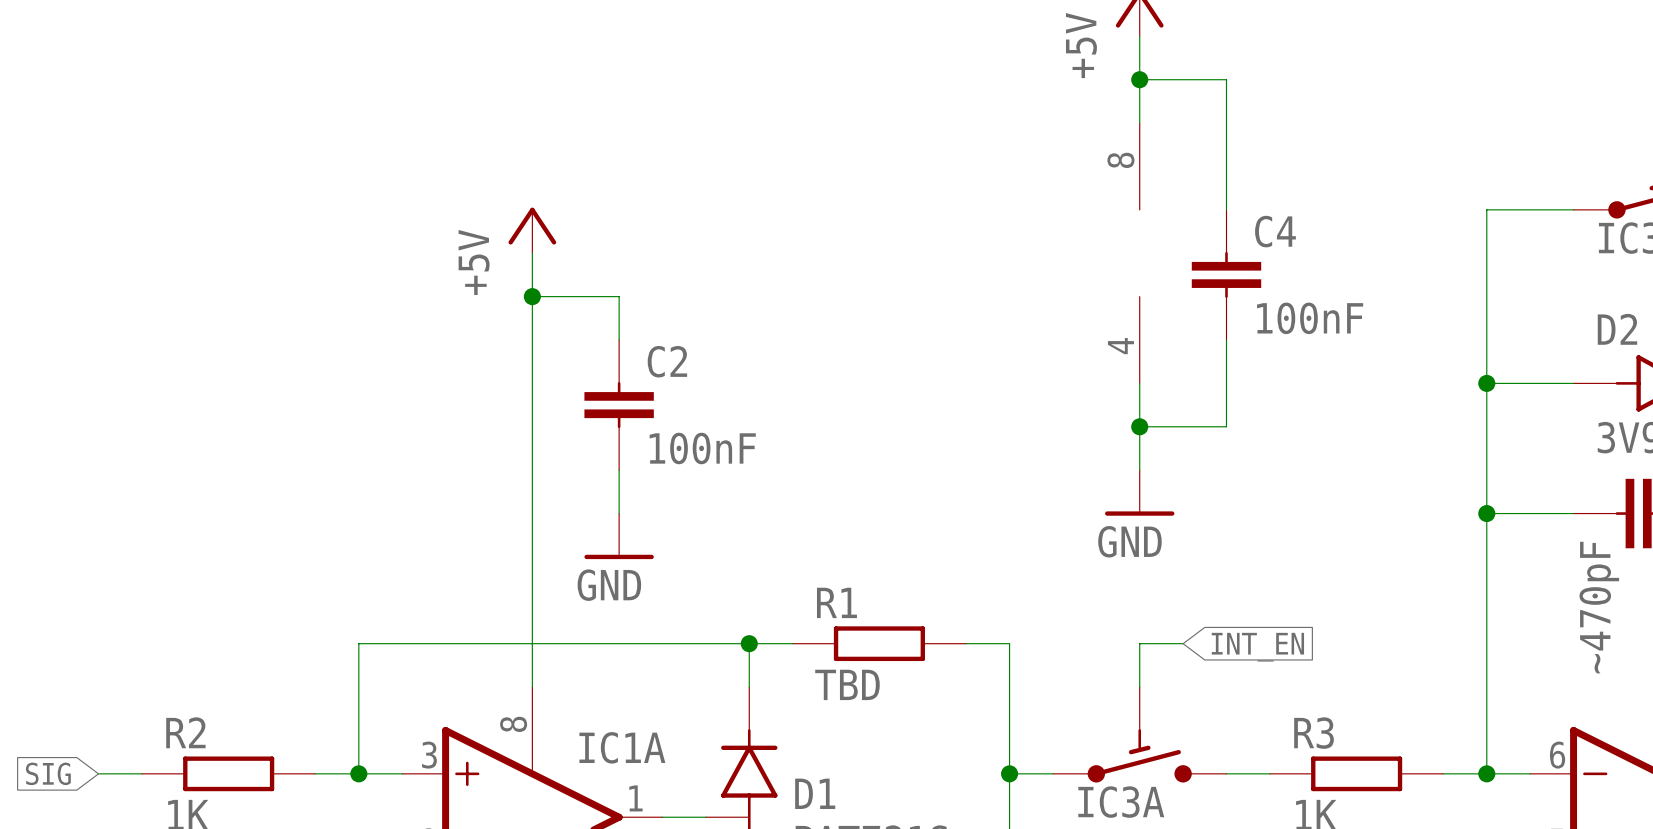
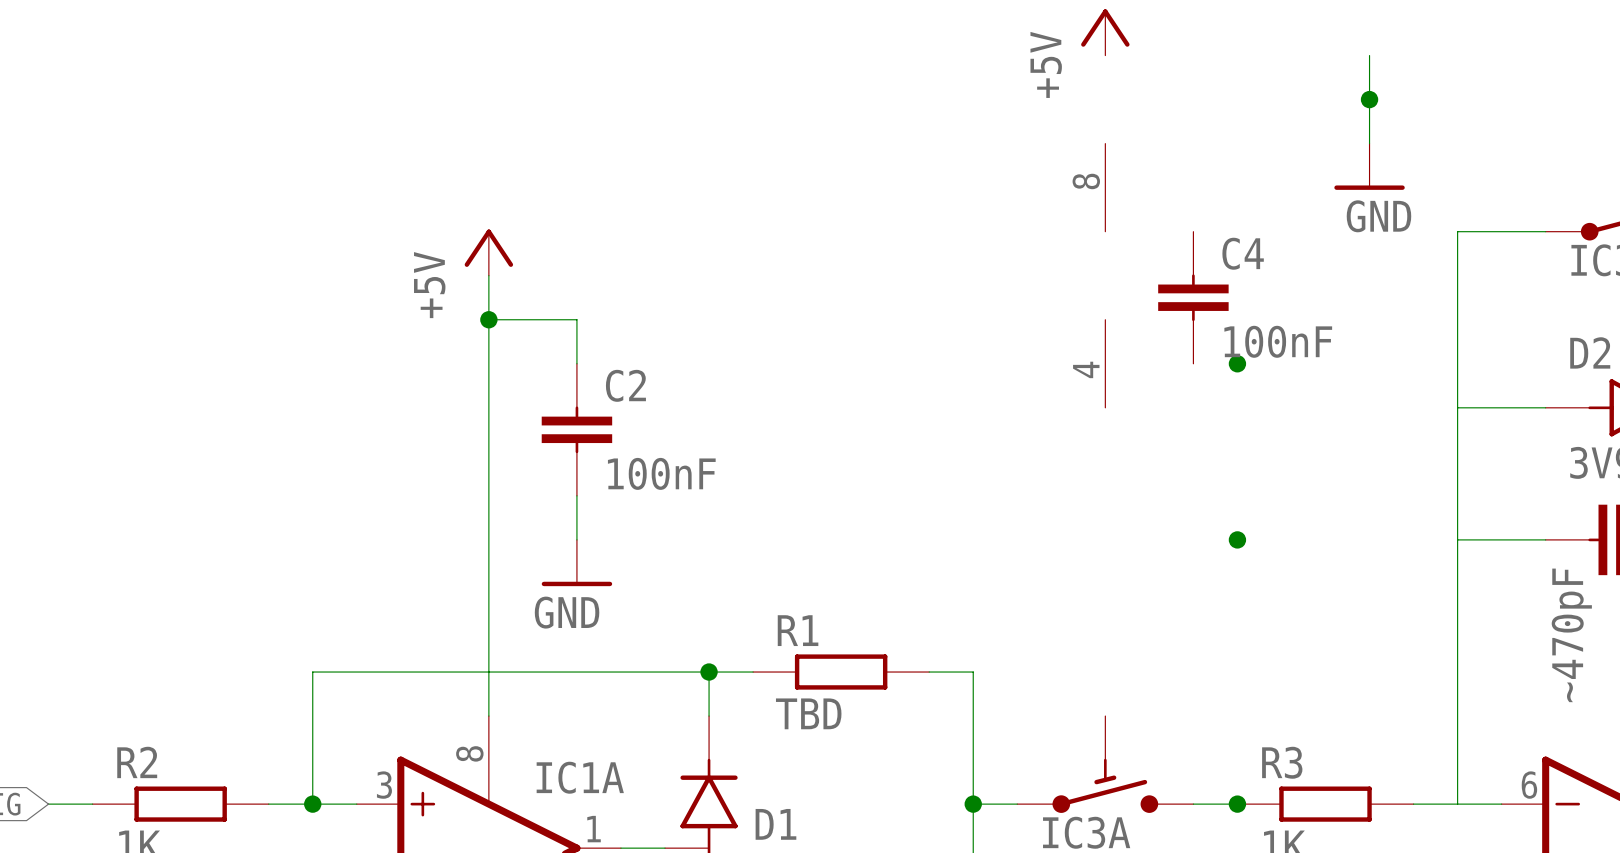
wire: (1139, 36) (1139, 123) -> (1369, 55) (1369, 143)
wire: (1139, 79) (1226, 79) (1226, 209) -> none
junction: (1139, 79) -> none
junction: none -> (1369, 99)
power symbol: none -> GND (1369, 166)
wire: (1226, 340) (1226, 426) (1139, 426) -> none
junction: none -> (1237, 363)
wire: (1139, 383) (1139, 470) -> none
junction: (1486, 383) -> none
junction: (1139, 426) -> none
power symbol: GND (1139, 492) -> none
junction: none -> (1237, 539)
junction: (1486, 513) -> none
wire: (1183, 643) (1139, 643) (1139, 687) -> none
global label: INT_EN (1257, 647) -> none
junction: none -> (1237, 804)
junction: (1486, 773) -> none

